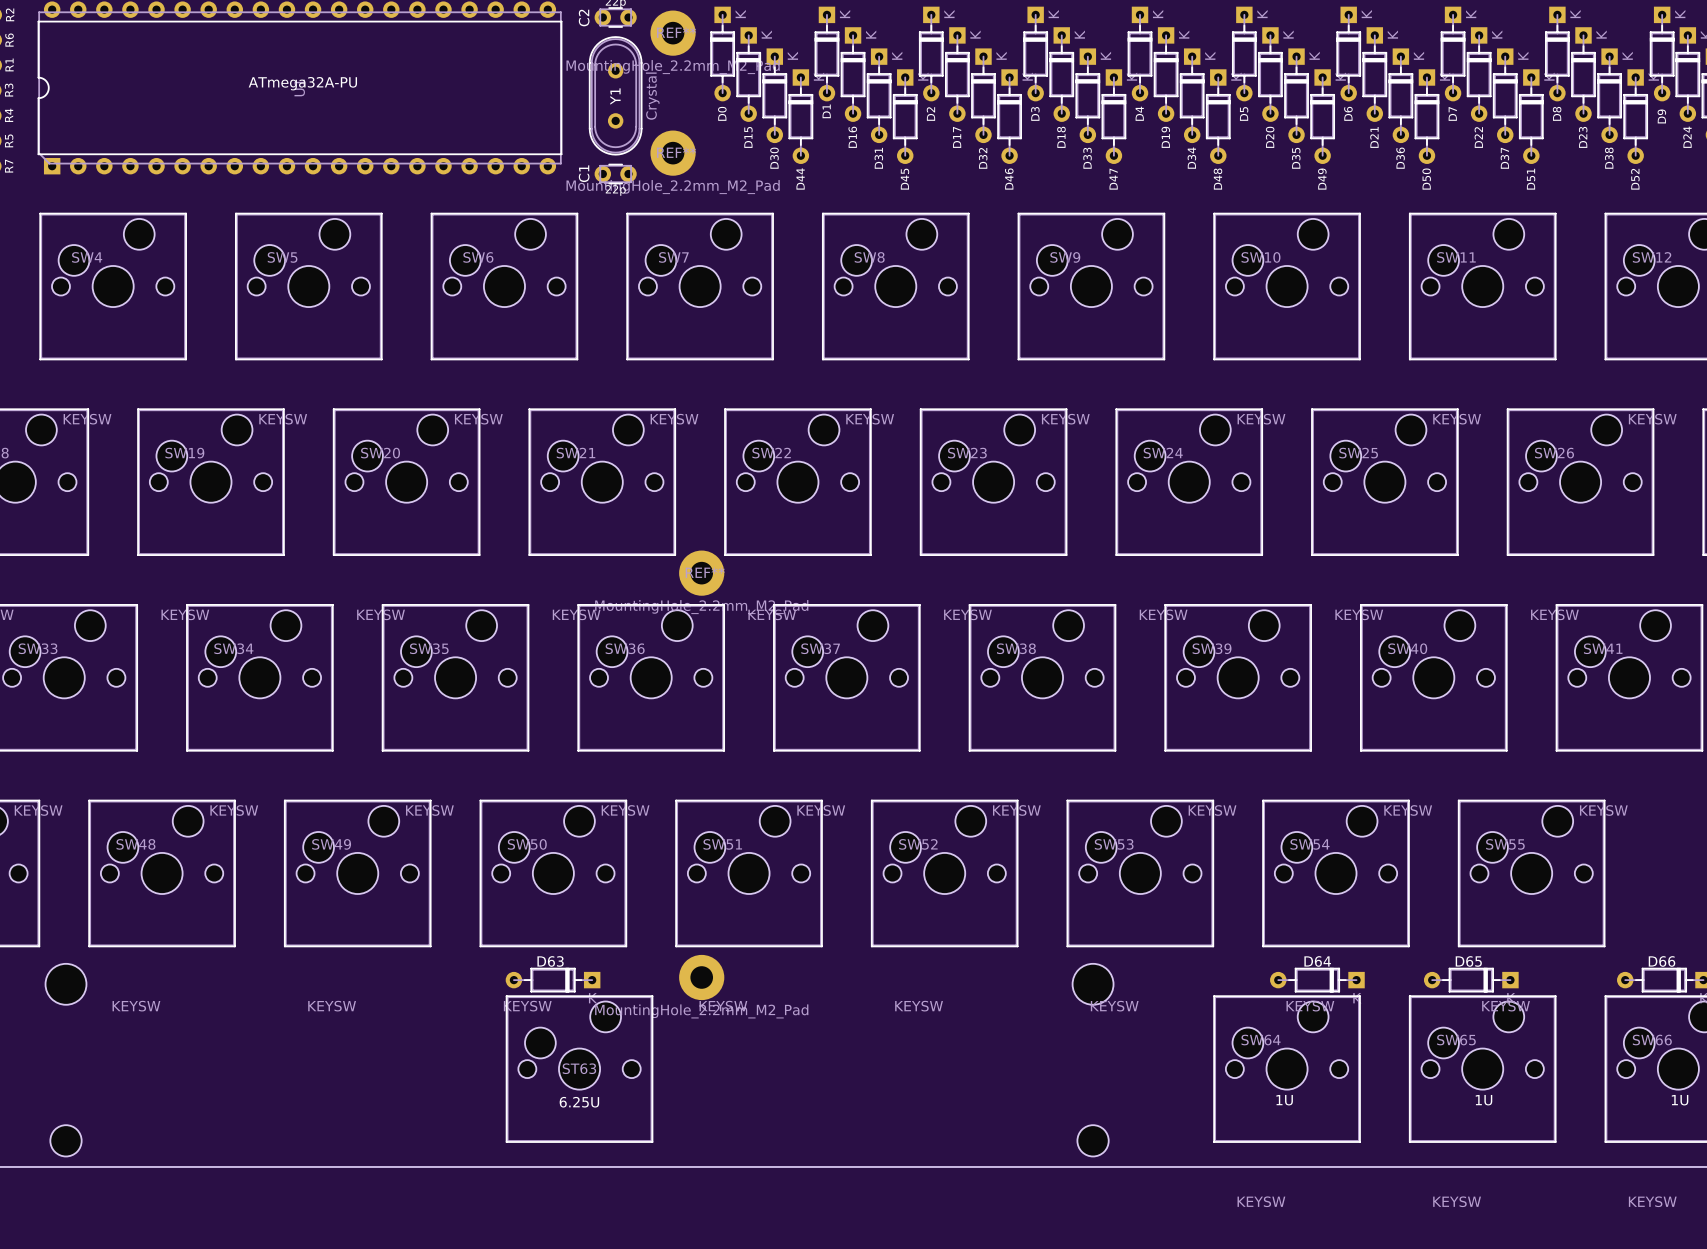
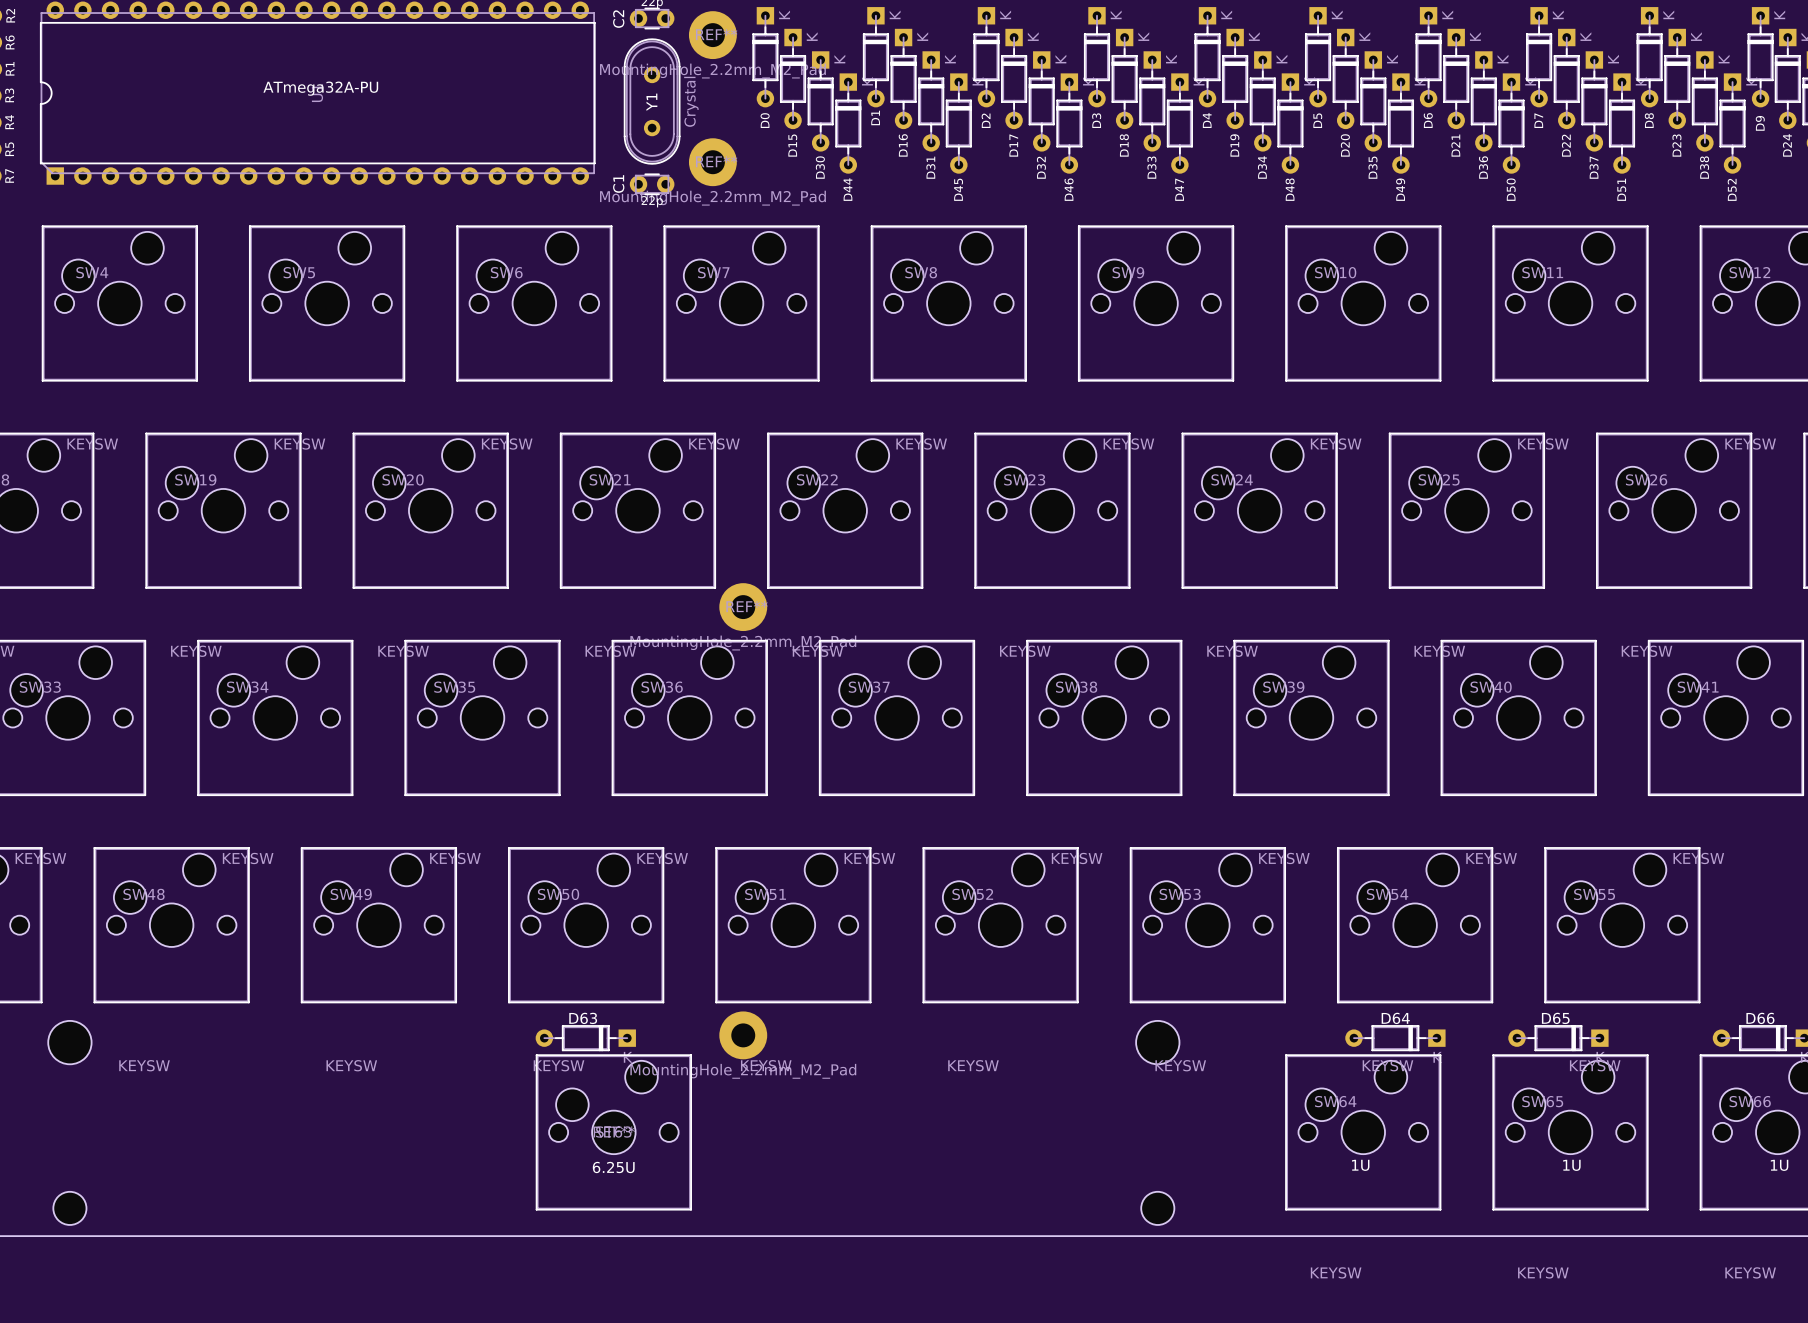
part footprint: [45, 963, 1114, 1157] -> [48, 1020, 1180, 1225]

